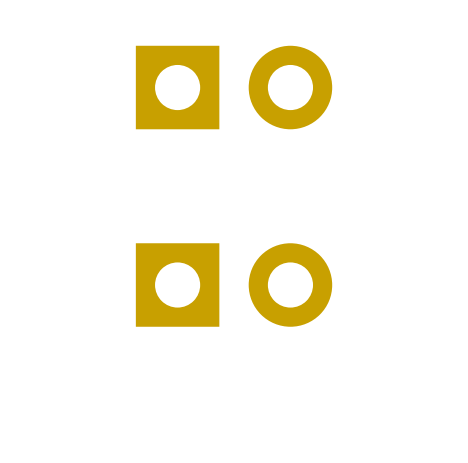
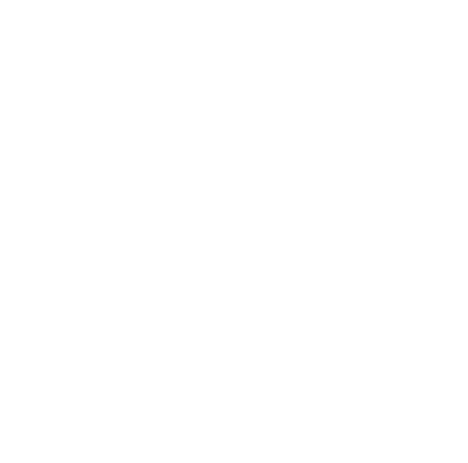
part: (234, 87) -> none
part: (234, 285) -> none

